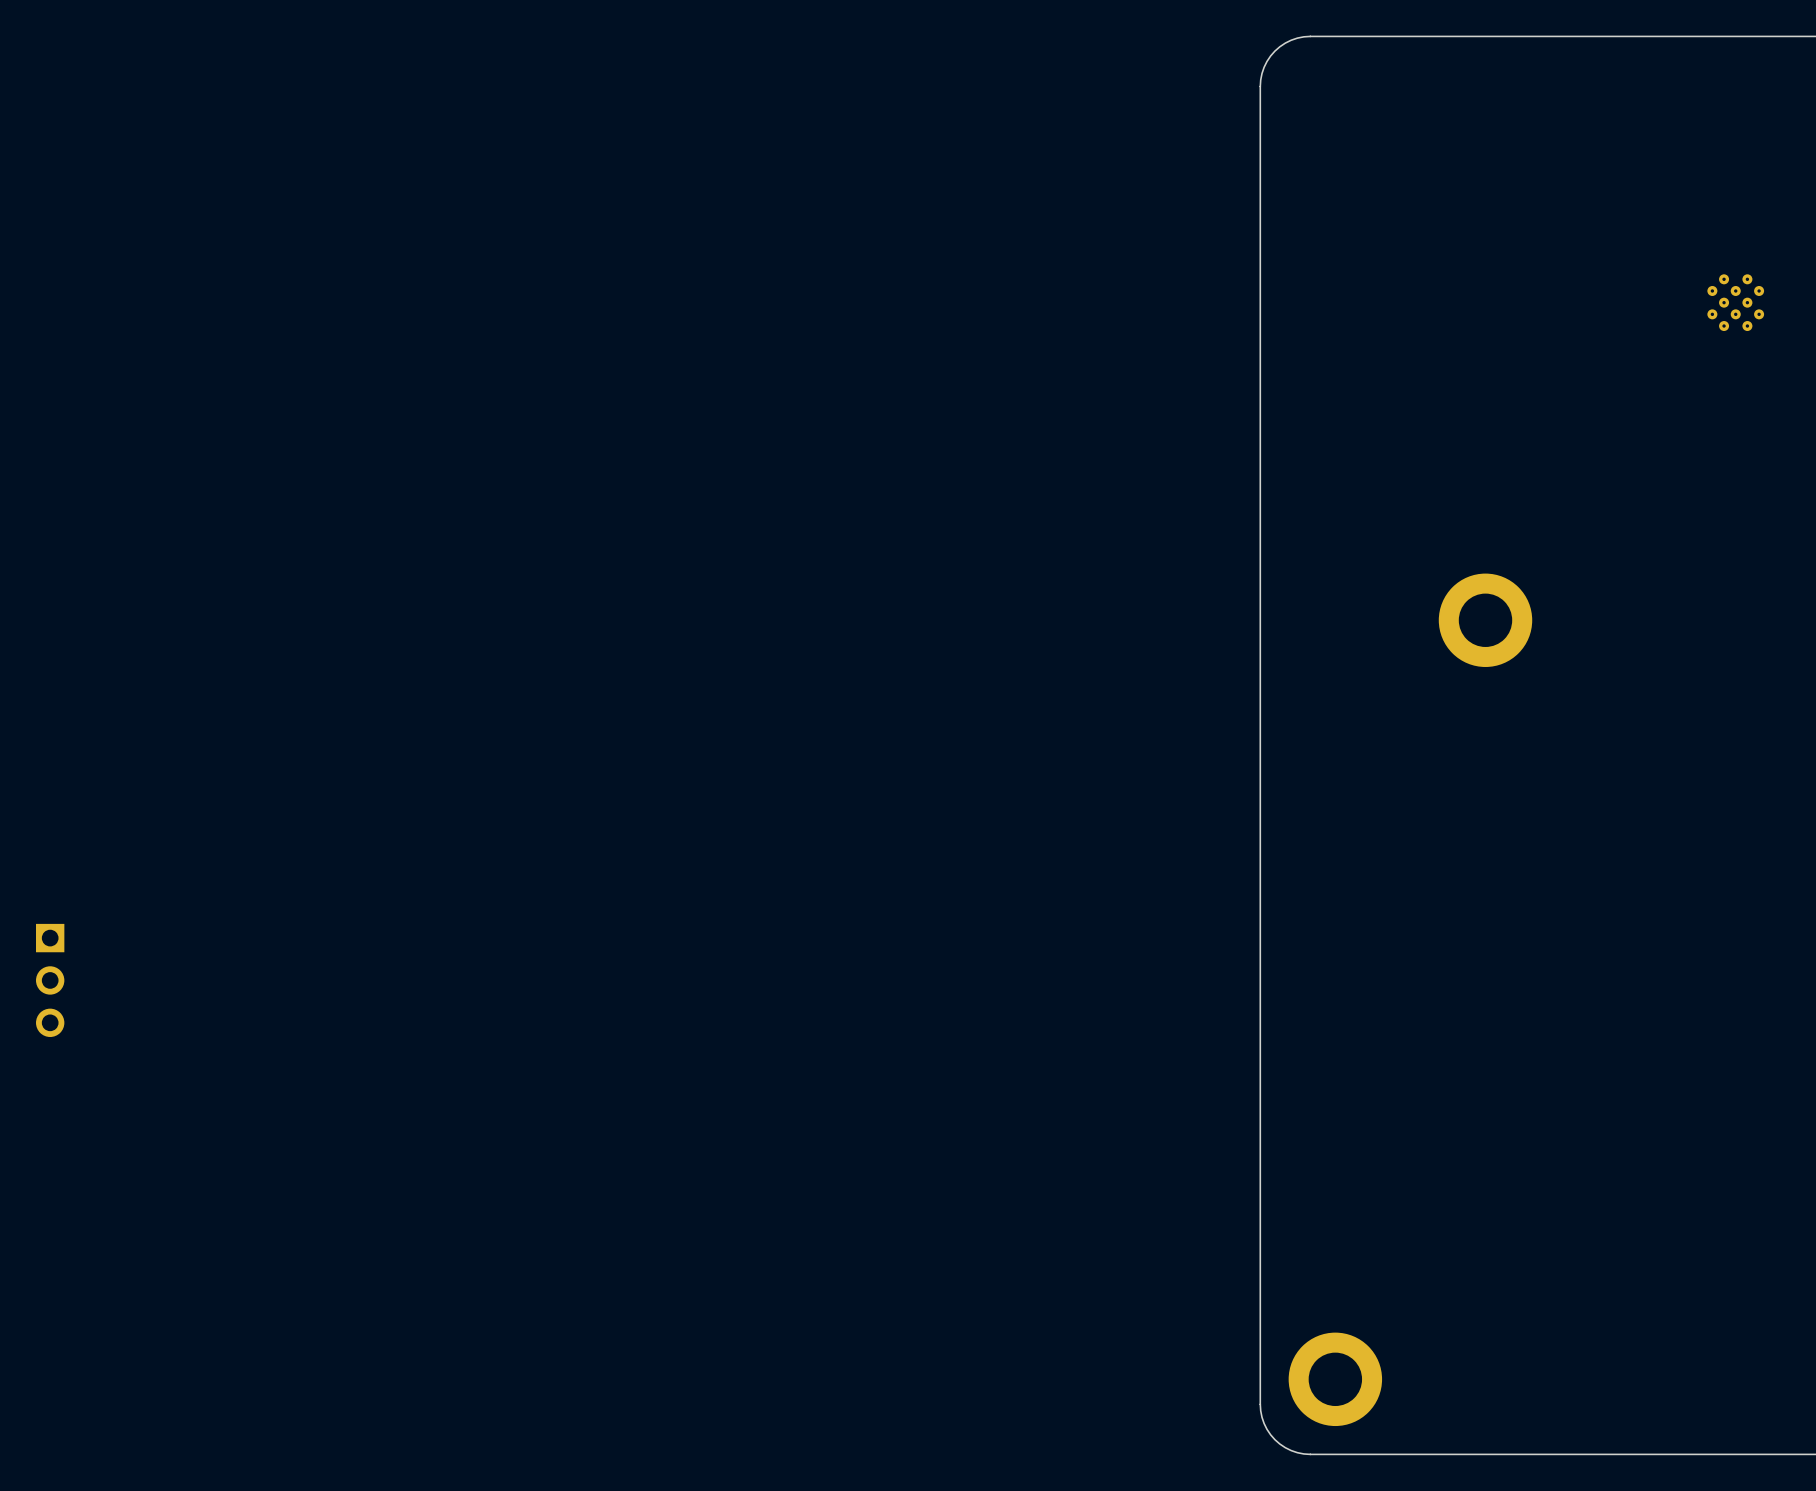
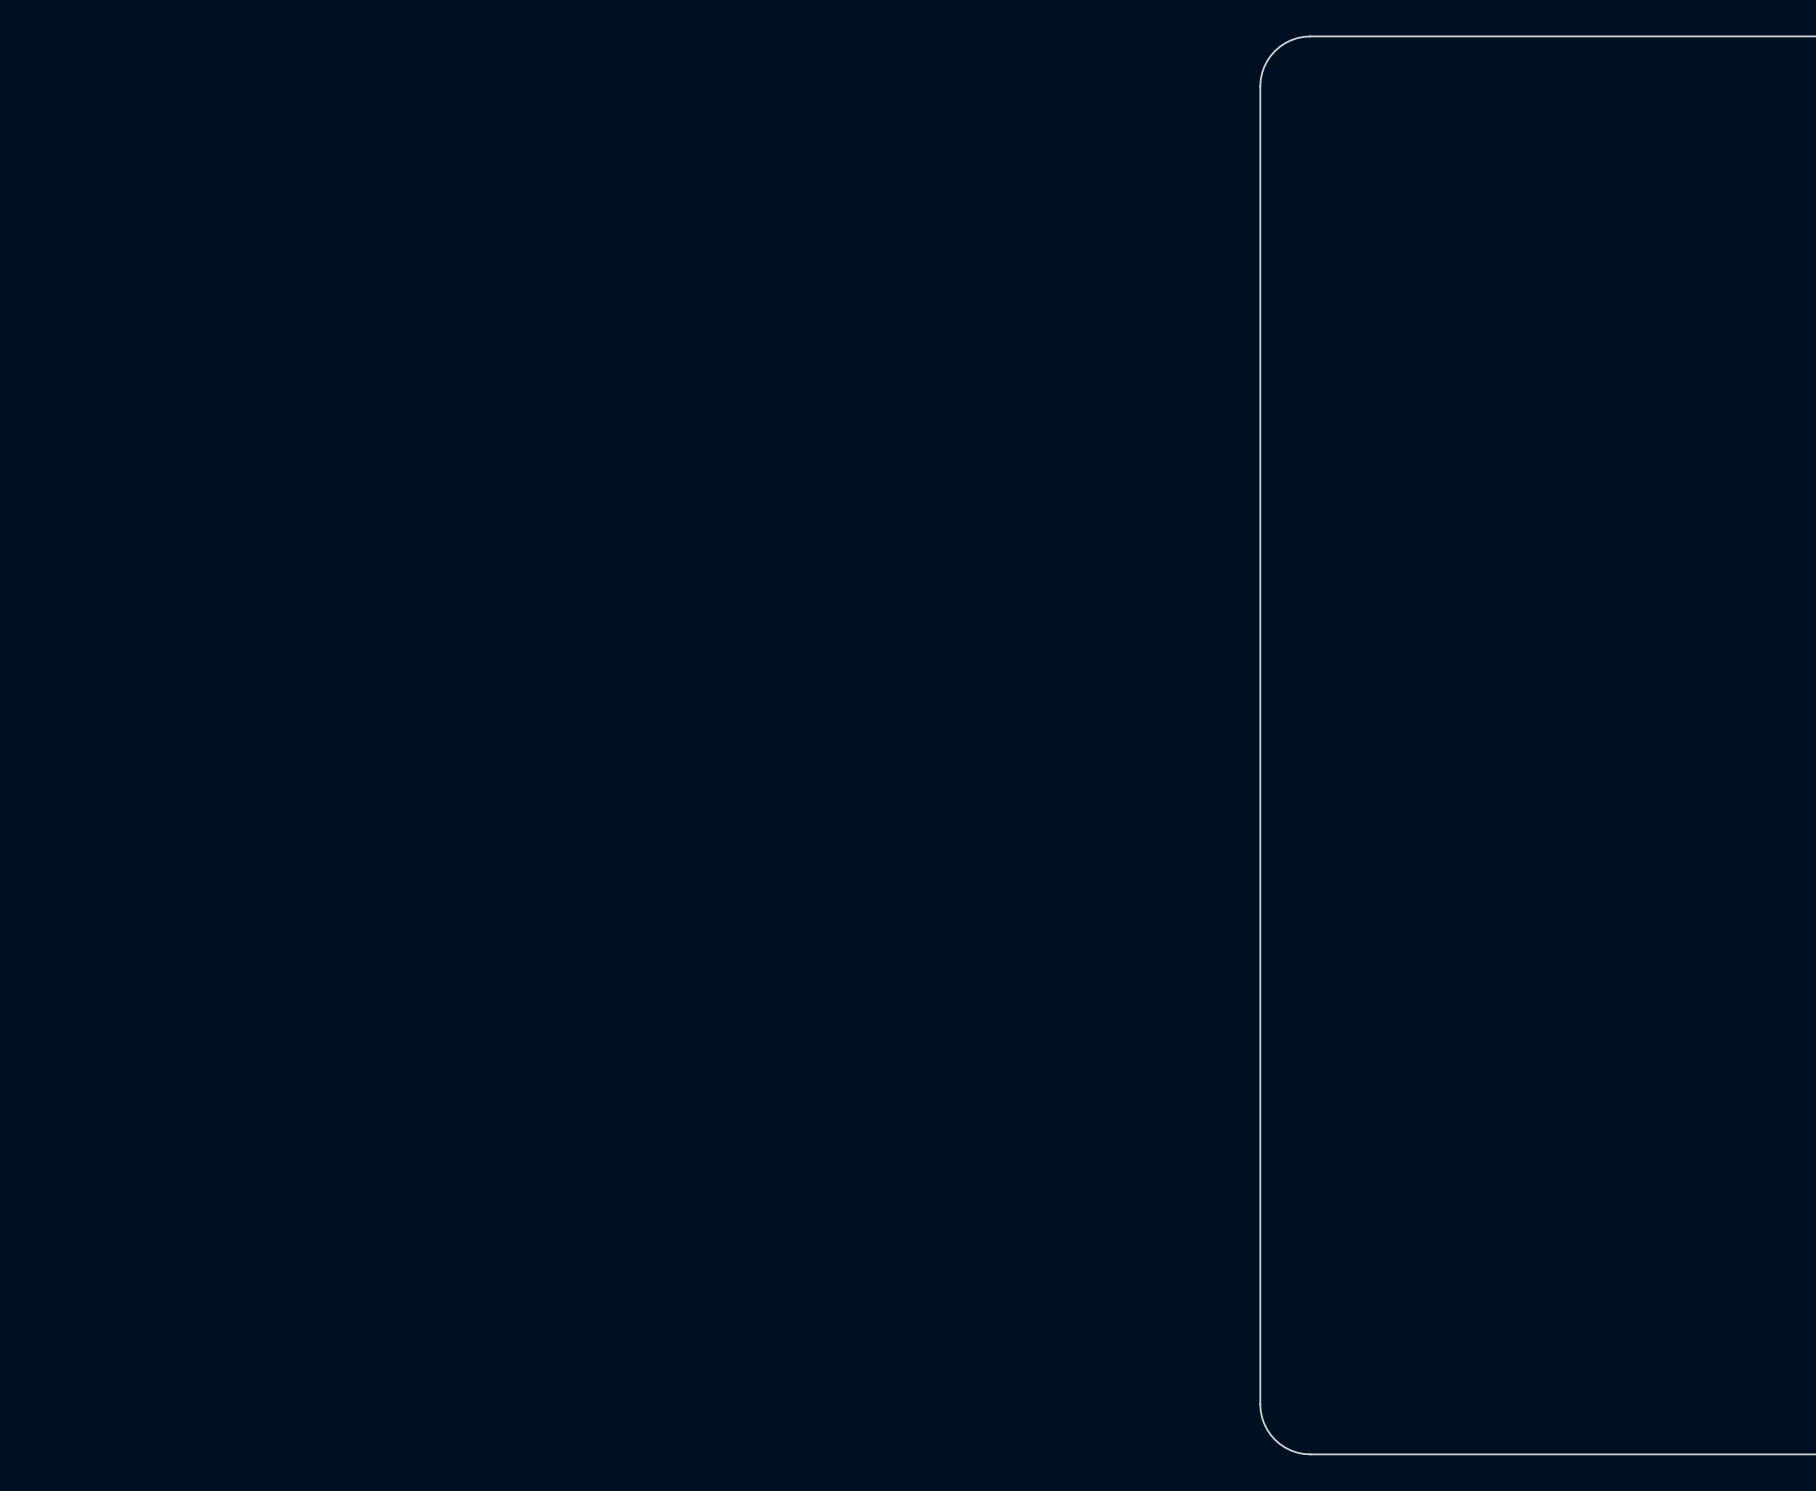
part: (1735, 302) -> none
part: (1485, 620) -> none
part: (50, 980) -> none
part: (1335, 1379) -> none

